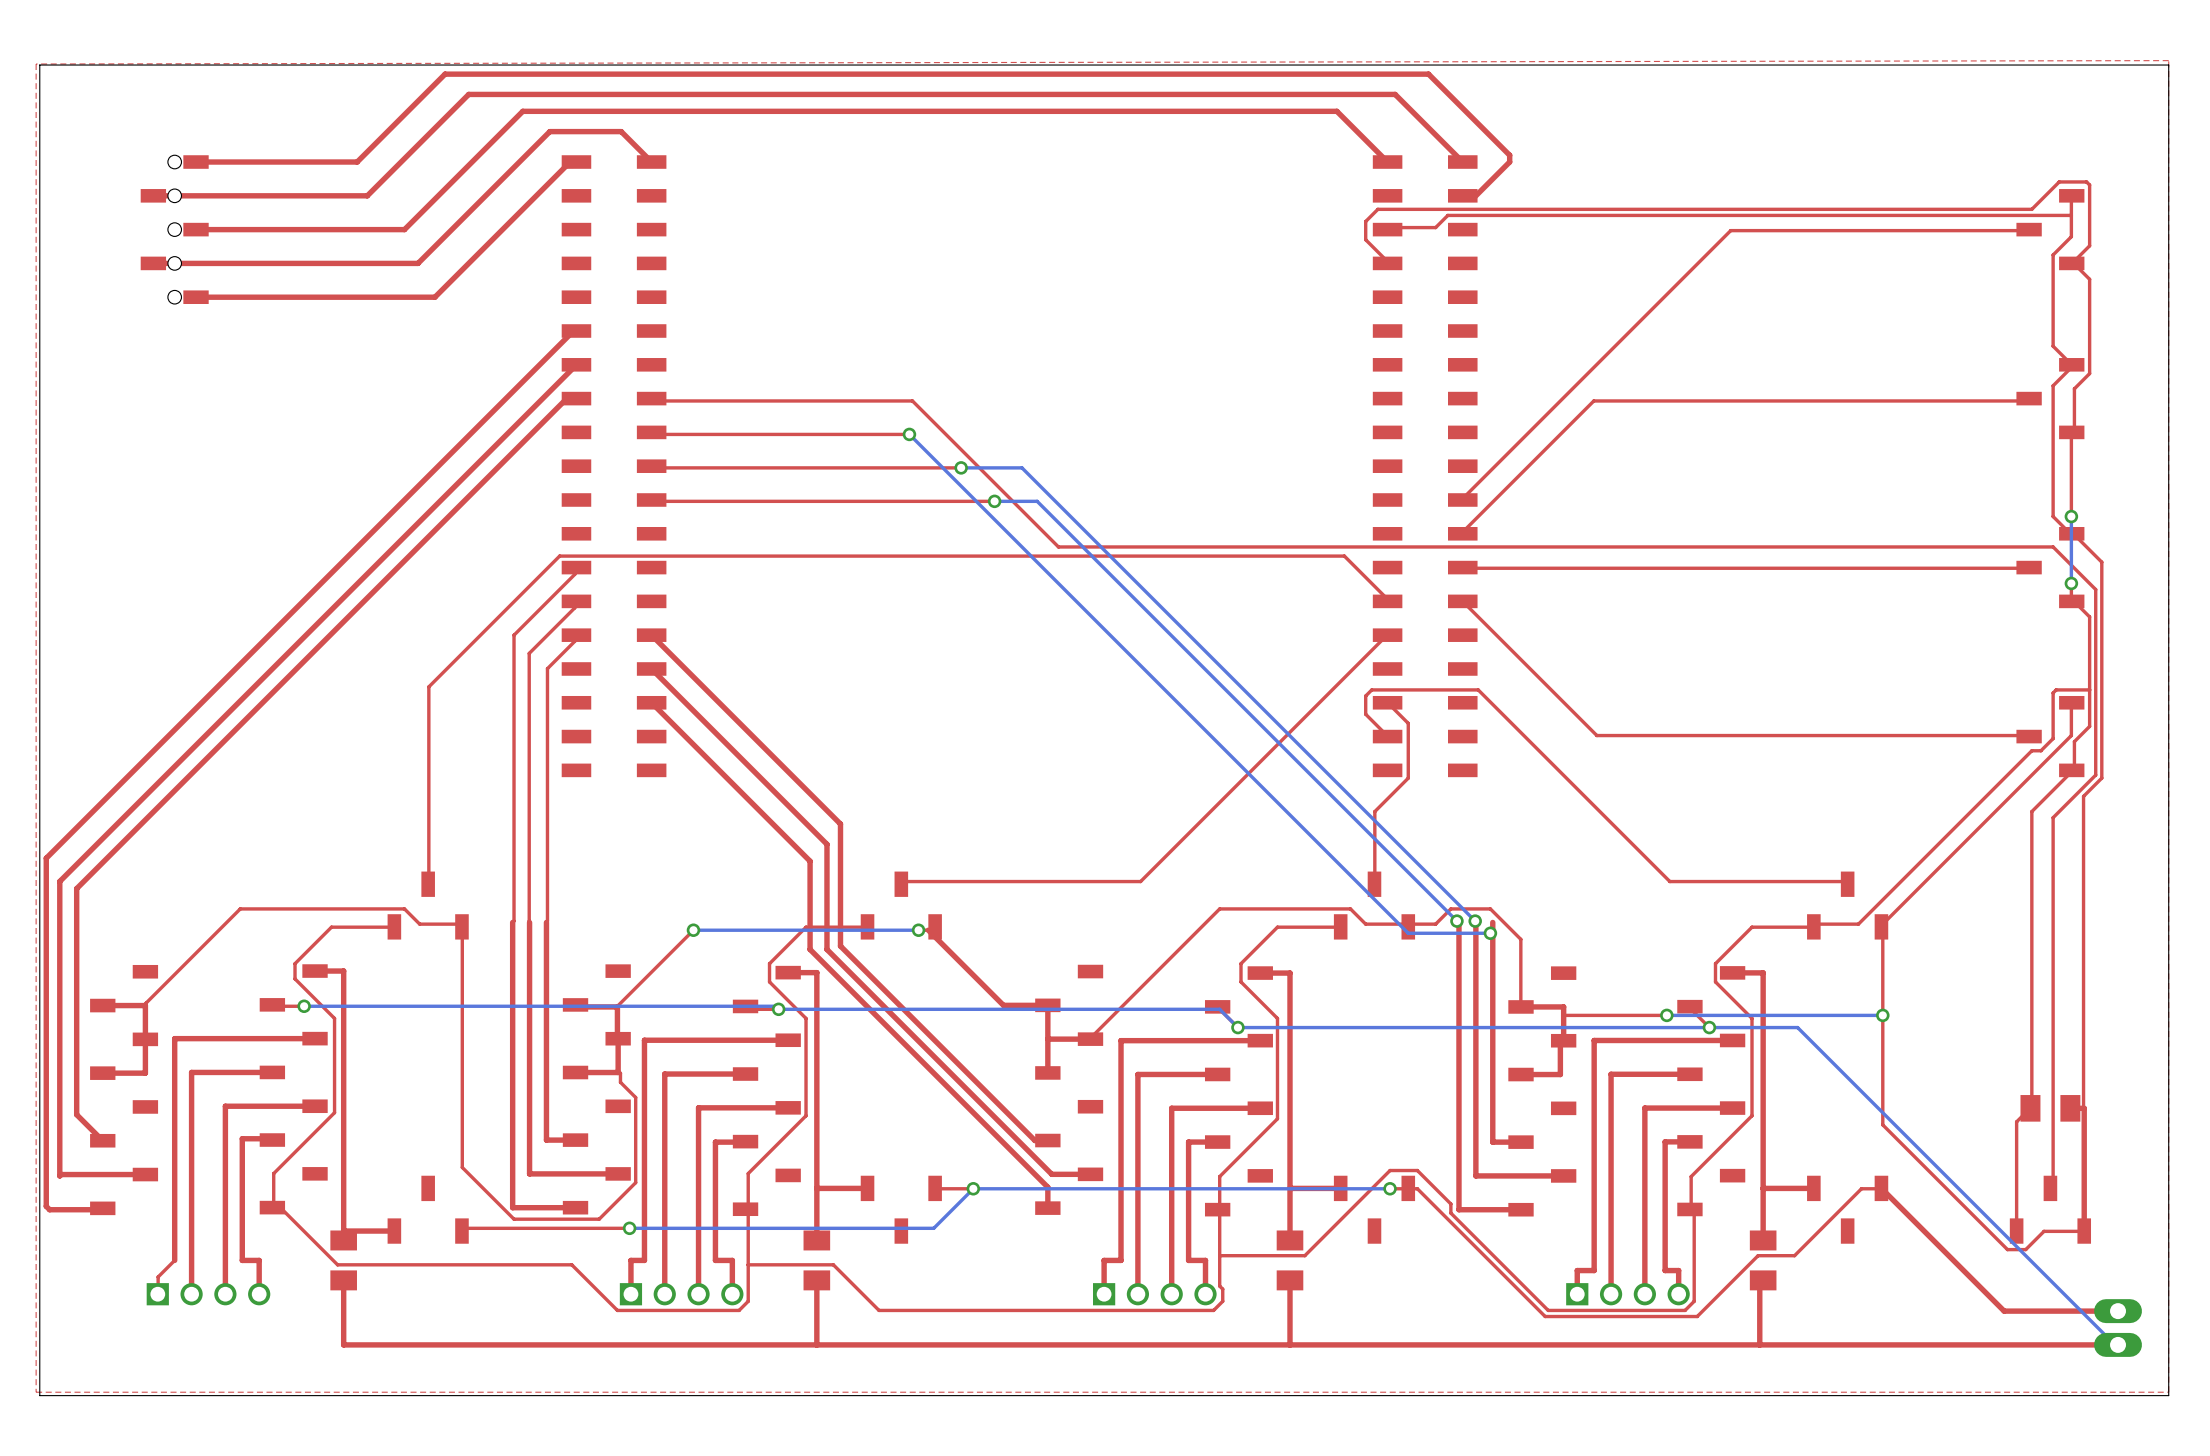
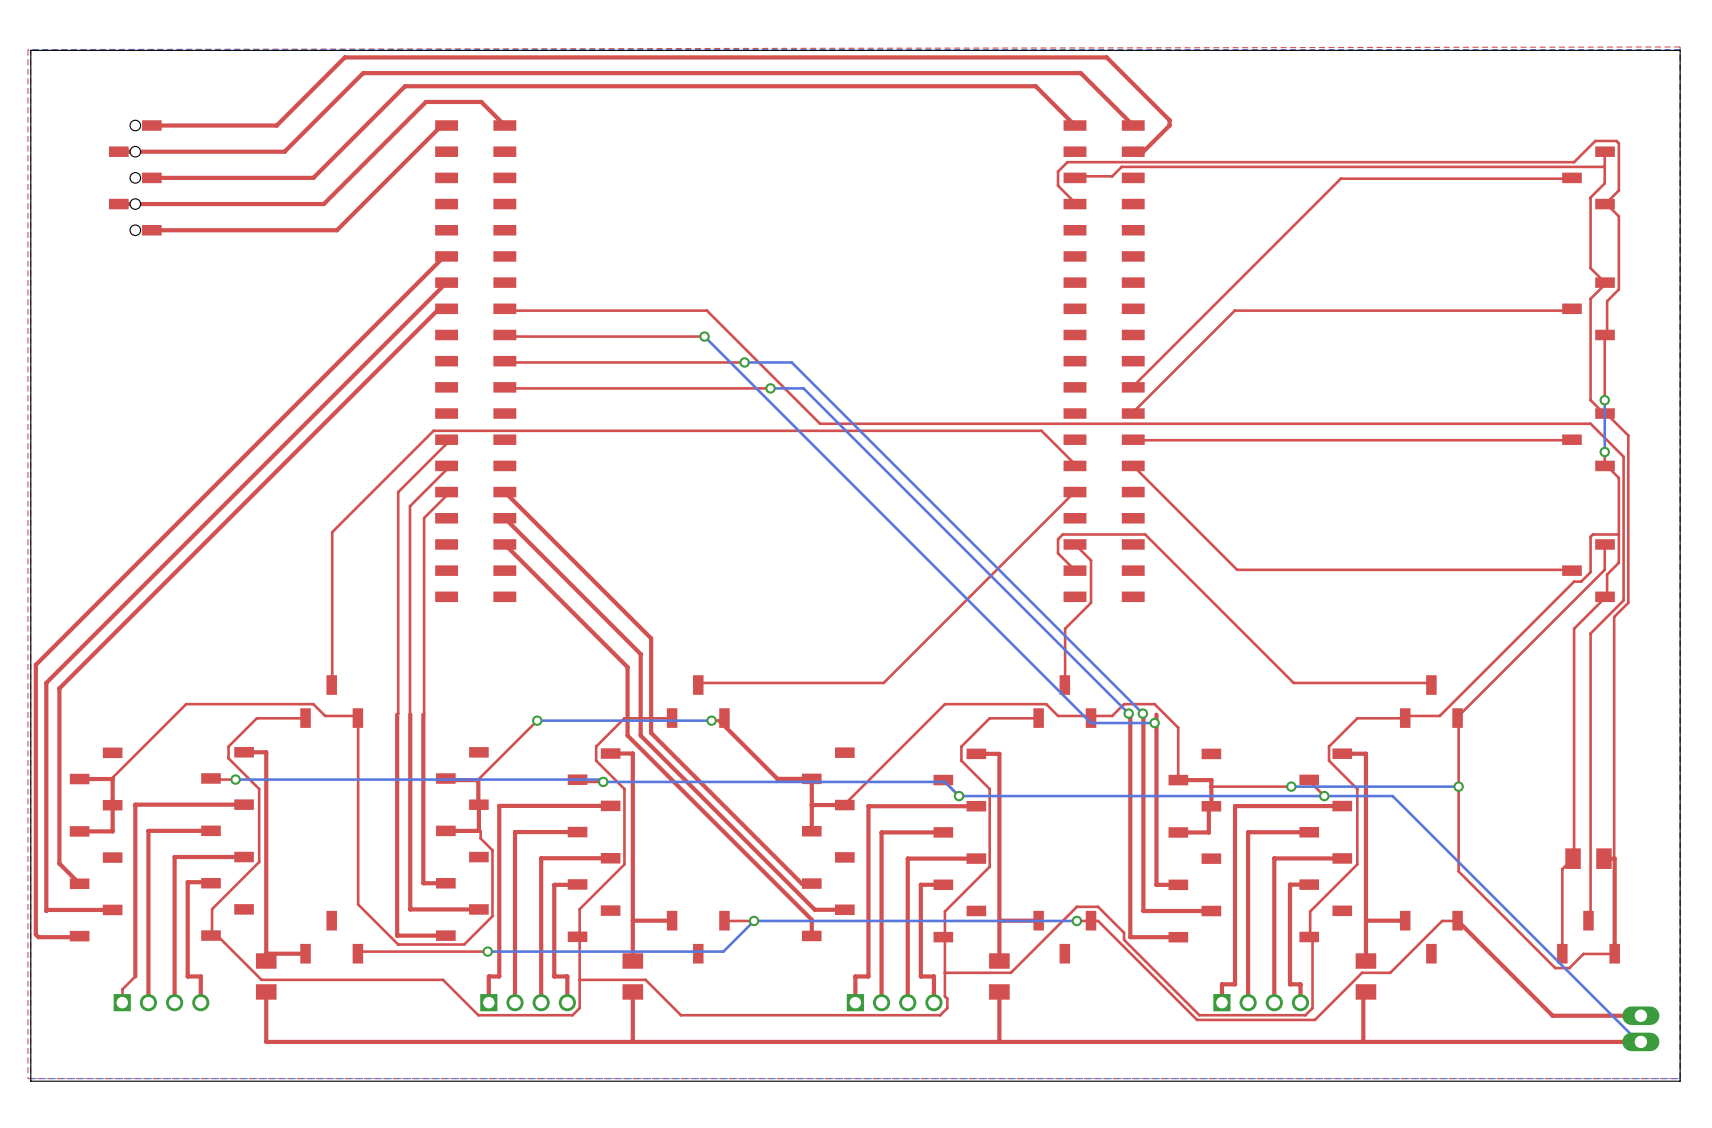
bottom zone outline: none -> (1680, 49) (30, 49) (30, 1078) (1680, 1078) (1680, 49)

